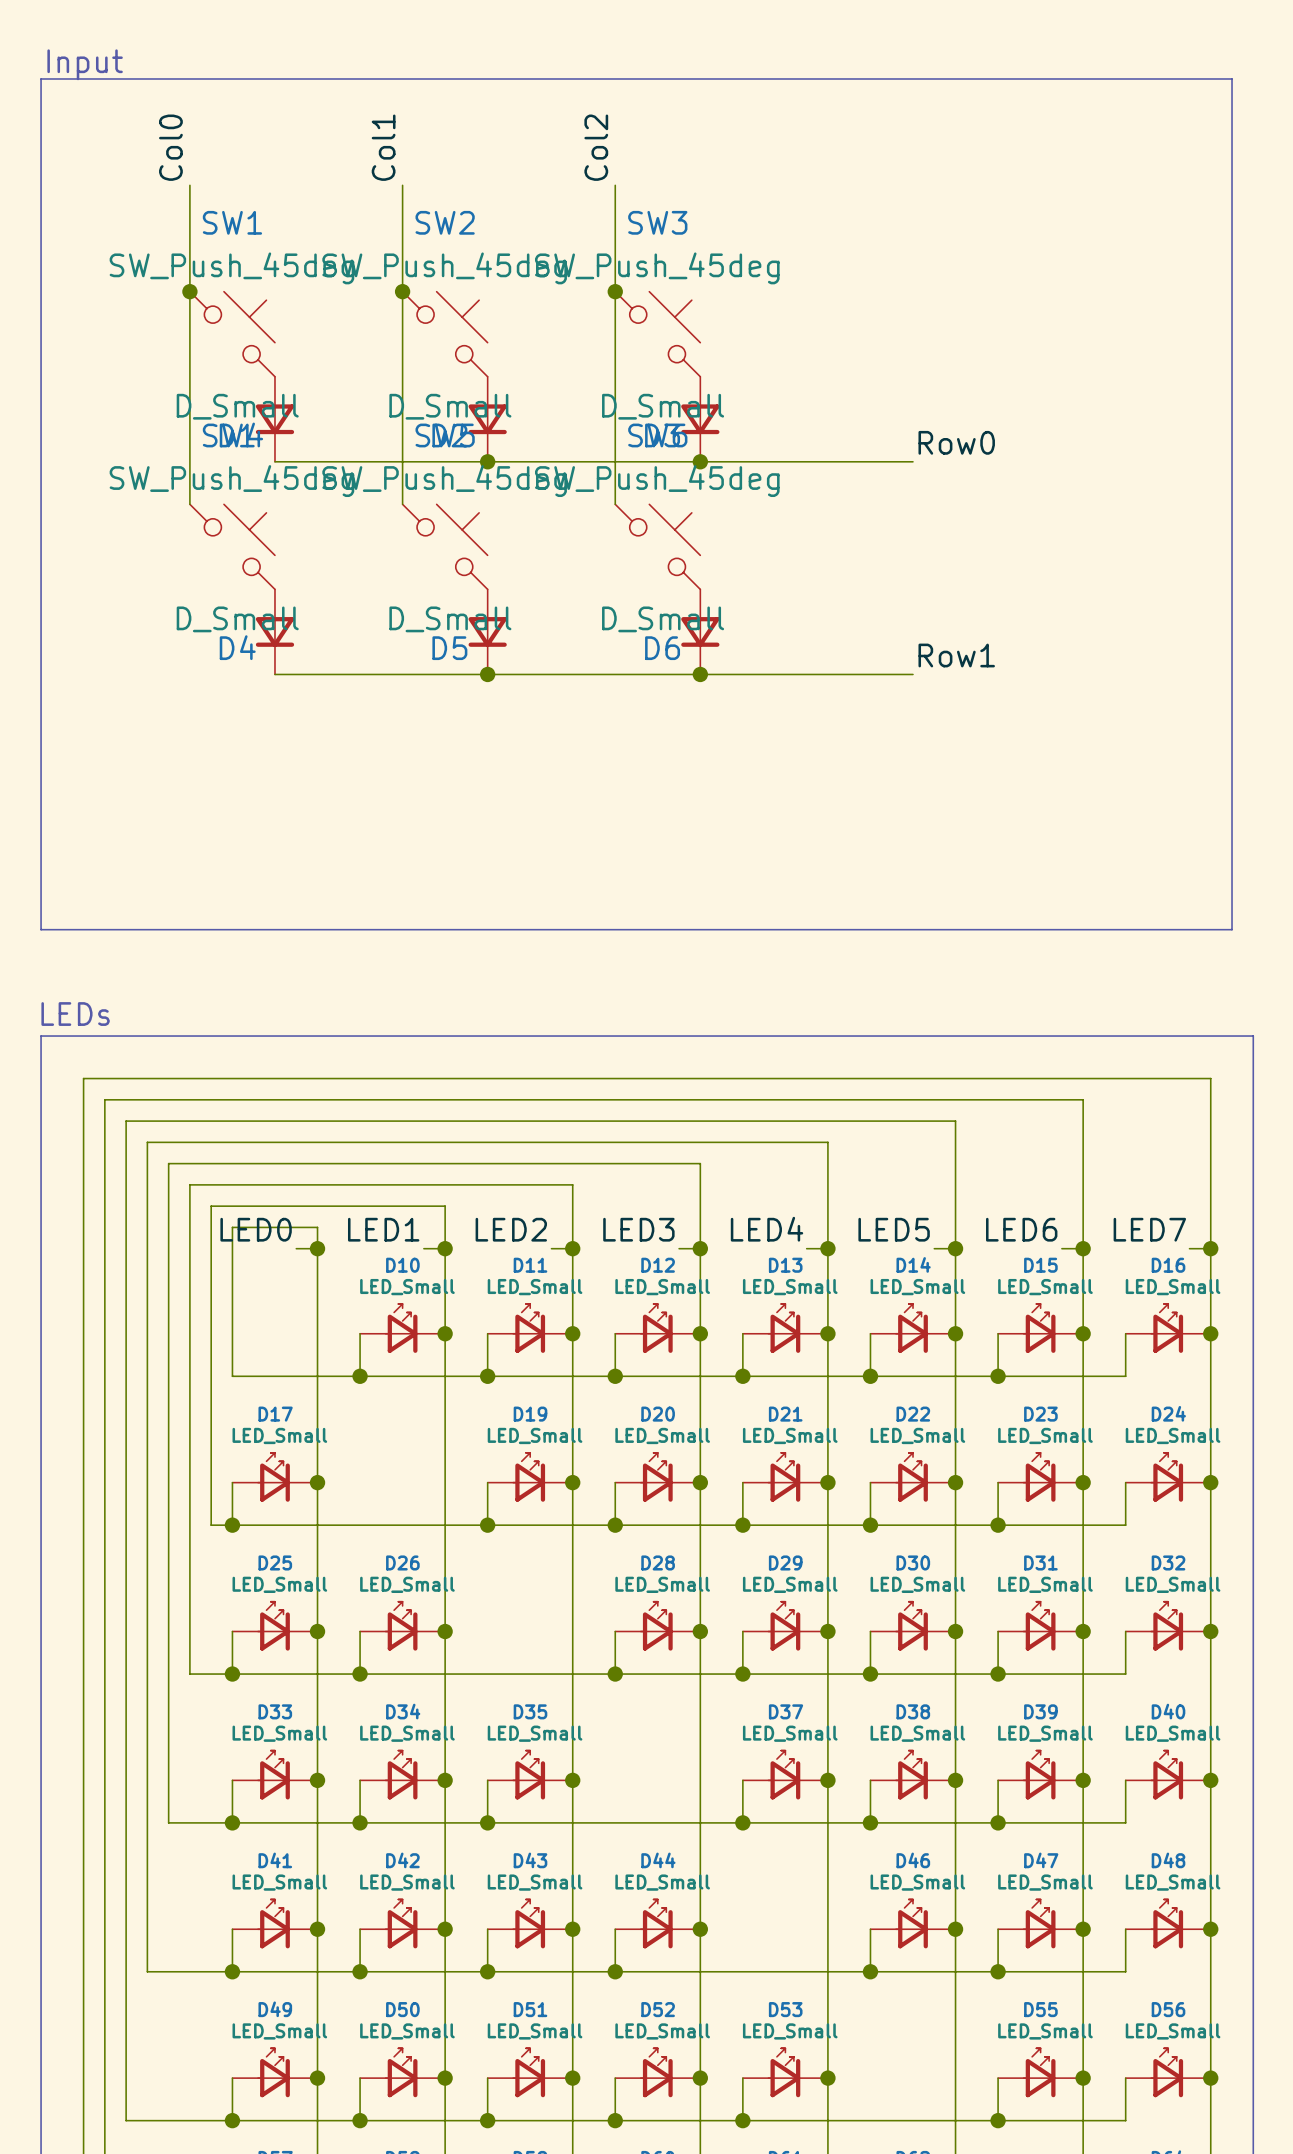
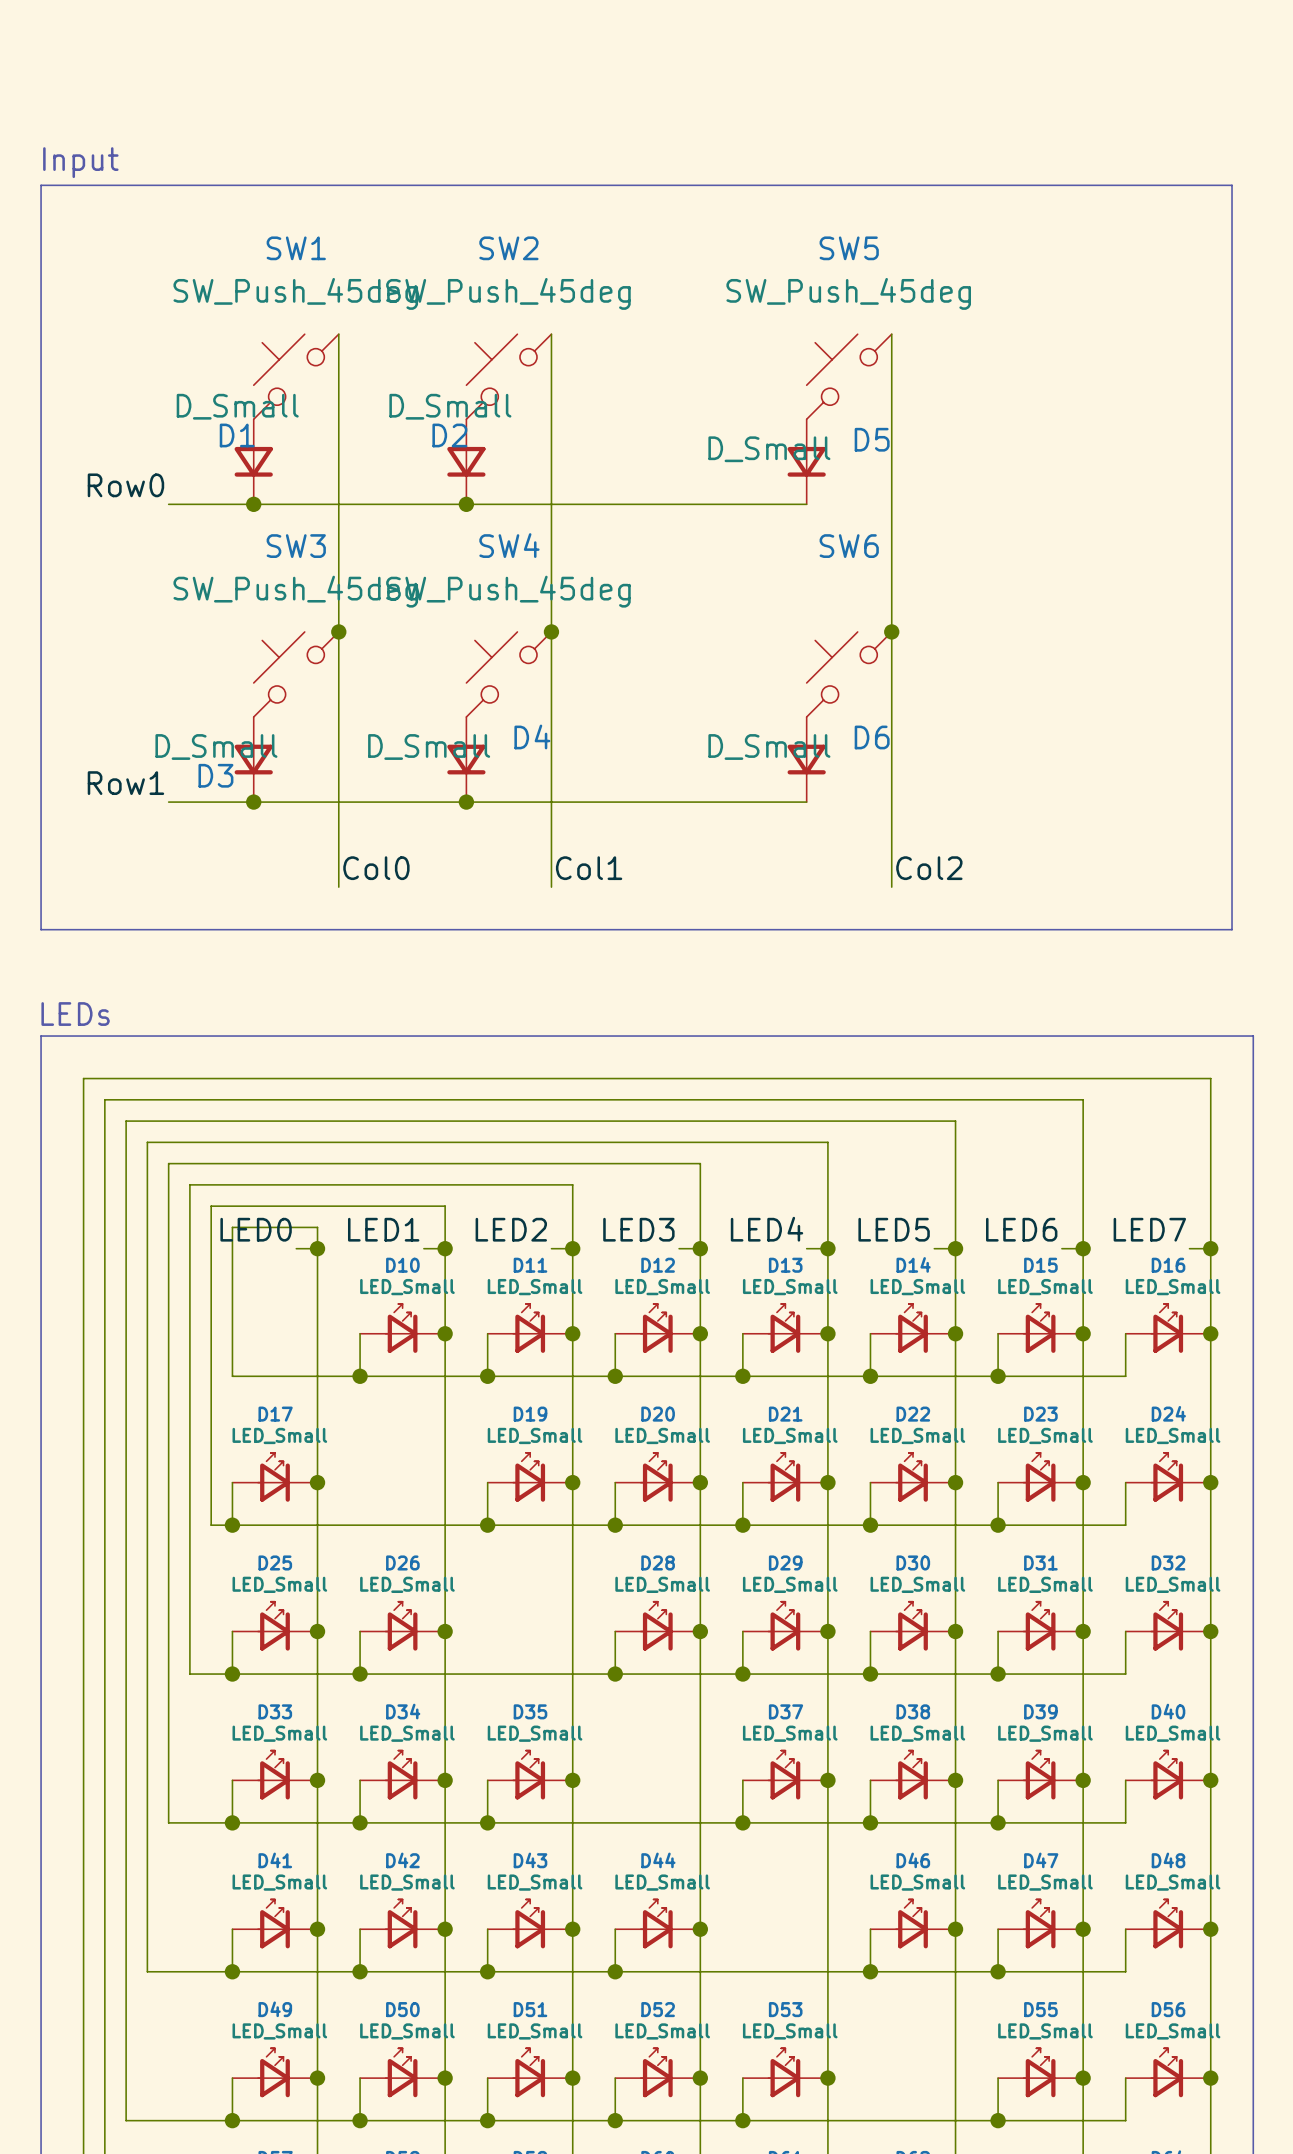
text position: Input (85, 64) -> Input (80, 162)
label: Col0 (170, 147) -> none
label: Col1 (383, 147) -> none
label: Col2 (596, 147) -> none
line: (41, 185) (41, 78) (1232, 78) (1232, 185) -> (41, 185) (1232, 185)
wire: (189, 185) (189, 504) -> none
wire: (402, 185) (402, 504) -> none
wire: (615, 185) (615, 504) -> none
junction: (189, 291) -> none
junction: (402, 291) -> none
junction: (615, 291) -> none
SW1 flip: as is (232, 334) -> left-right (296, 376)
SW1 position: (232, 334) -> (296, 376)
wire: none -> (338, 334) (338, 887)
SW2 flip: as is (445, 334) -> left-right (508, 376)
SW2 position: (445, 334) -> (508, 376)
wire: none -> (551, 334) (551, 887)
SW3 flip: as is (657, 334) -> left-right (296, 674)
SW3 position: (657, 334) -> (296, 674)
wire: none -> (891, 334) (891, 887)
D1 position: (274, 419) -> (253, 461)
D2 position: (487, 419) -> (466, 461)
D3 position: (700, 419) -> (253, 759)
label: Row0 (956, 442) -> none
wire: (274, 461) (913, 461) -> (168, 504) (806, 504)
junction position: (487, 461) -> (466, 504)
junction: (700, 461) -> none
SW6 value: SW_Push_45deg (657, 481) -> none
label: none -> Row0 (125, 485)
junction: none -> (253, 504)
SW4 flip: as is (232, 546) -> left-right (508, 674)
SW4 position: (232, 546) -> (508, 674)
SW5 flip: as is (445, 546) -> left-right (849, 376)
SW5 position: (445, 546) -> (849, 376)
SW6 flip: as is (657, 546) -> left-right (849, 674)
SW6 position: (657, 546) -> (849, 674)
D4 position: (274, 631) -> (466, 759)
junction: none -> (338, 631)
D5 position: (487, 631) -> (806, 461)
junction: none -> (551, 631)
D6 position: (700, 631) -> (806, 759)
junction: none -> (891, 631)
D4 name position: D4 (237, 647) -> D4 (532, 736)
D5 name position: D5 (449, 648) -> D5 (872, 439)
D6 name position: D6 (662, 648) -> D6 (872, 737)
label: Row1 (956, 655) -> none
wire: (274, 674) (913, 674) -> (168, 802) (806, 802)
junction: (487, 674) -> none
junction: (700, 674) -> none
label: none -> Row1 (125, 783)
junction: none -> (253, 802)
junction: none -> (466, 802)
label: none -> Col0 (376, 868)
label: none -> Col1 (589, 868)
label: none -> Col2 (929, 868)

